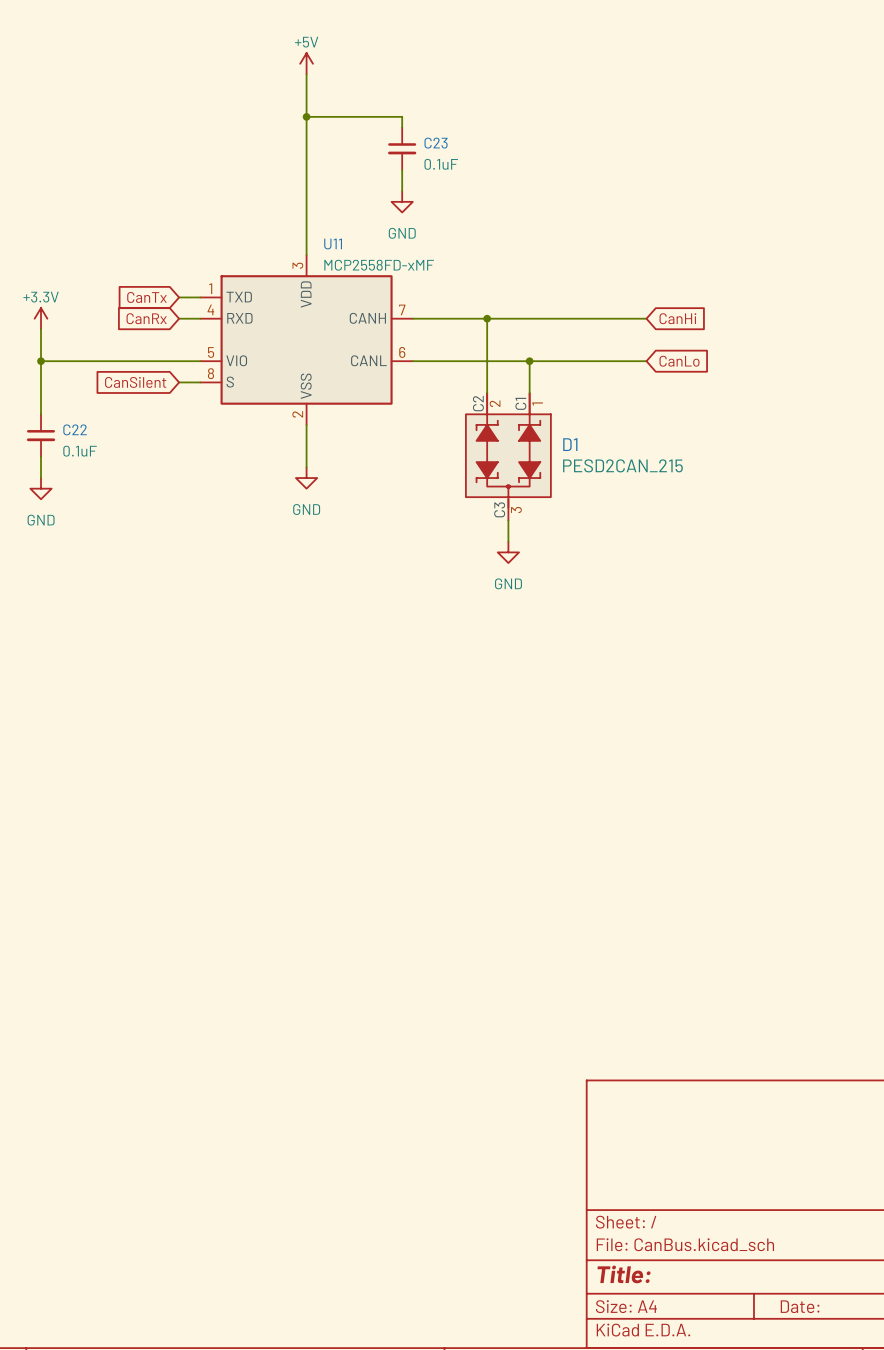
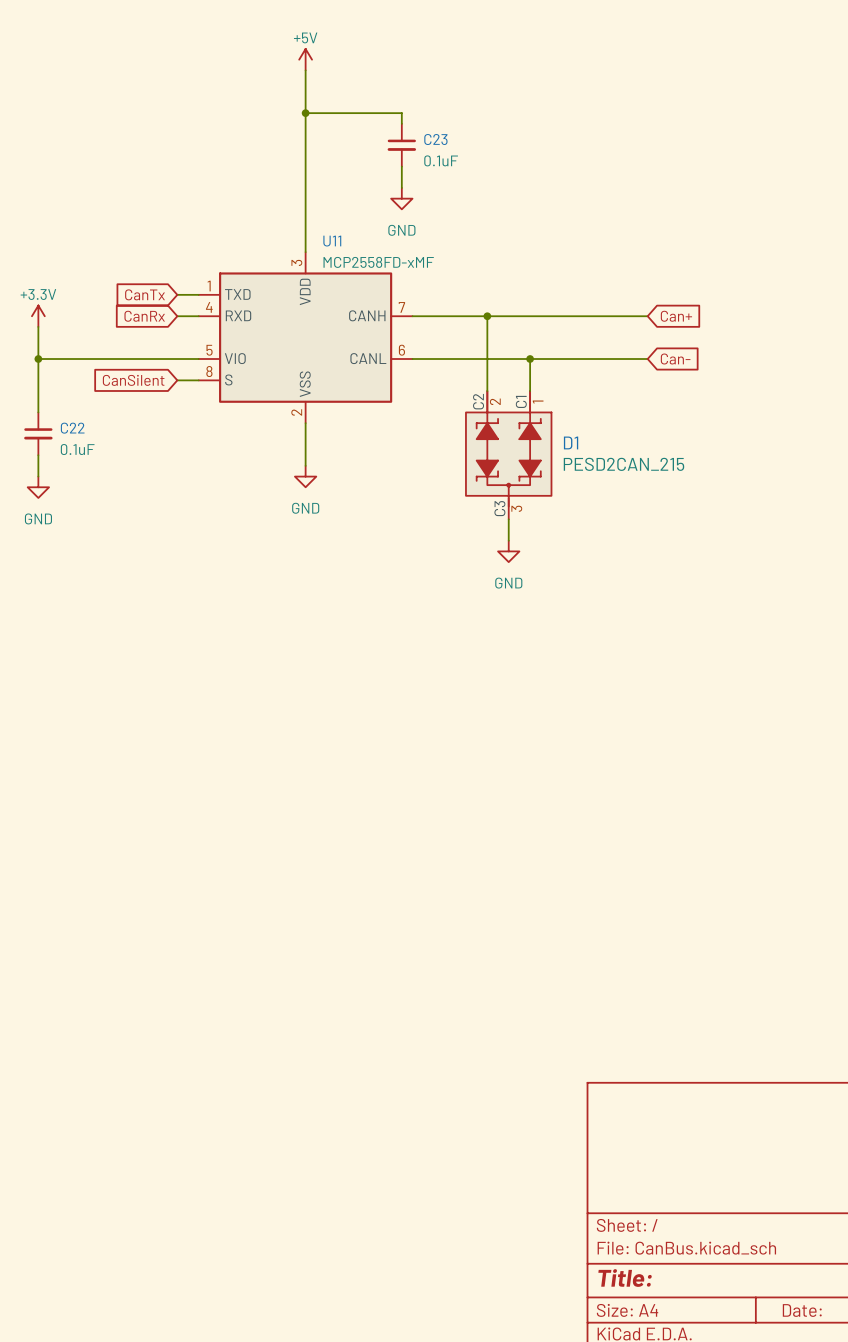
global label: CanHi (677, 318) -> Can+ (676, 316)
global label: CanLo (679, 361) -> Can- (675, 359)

